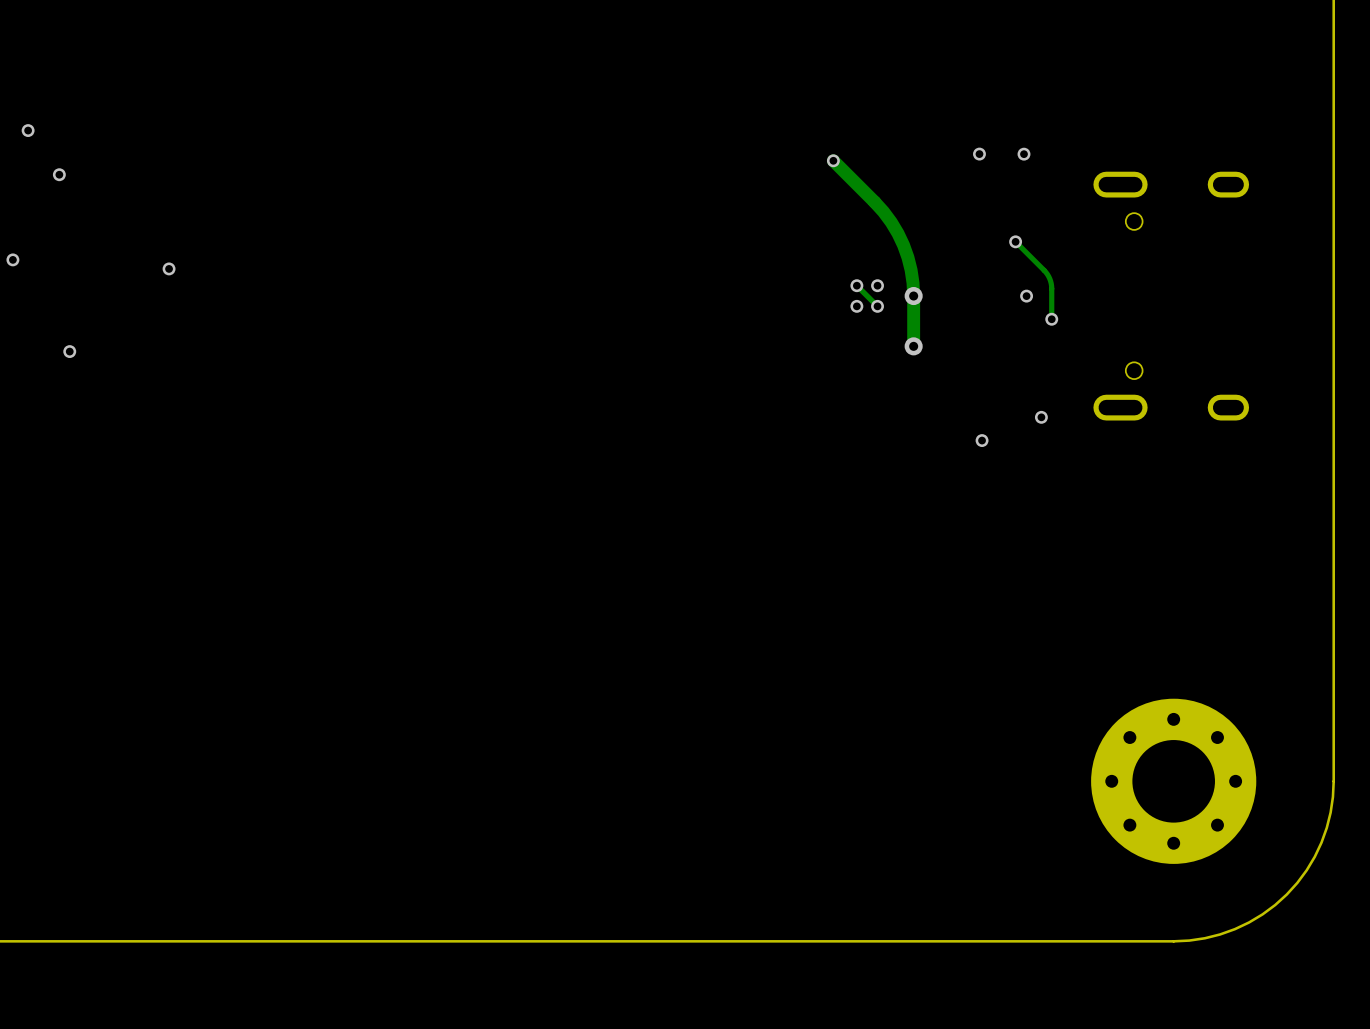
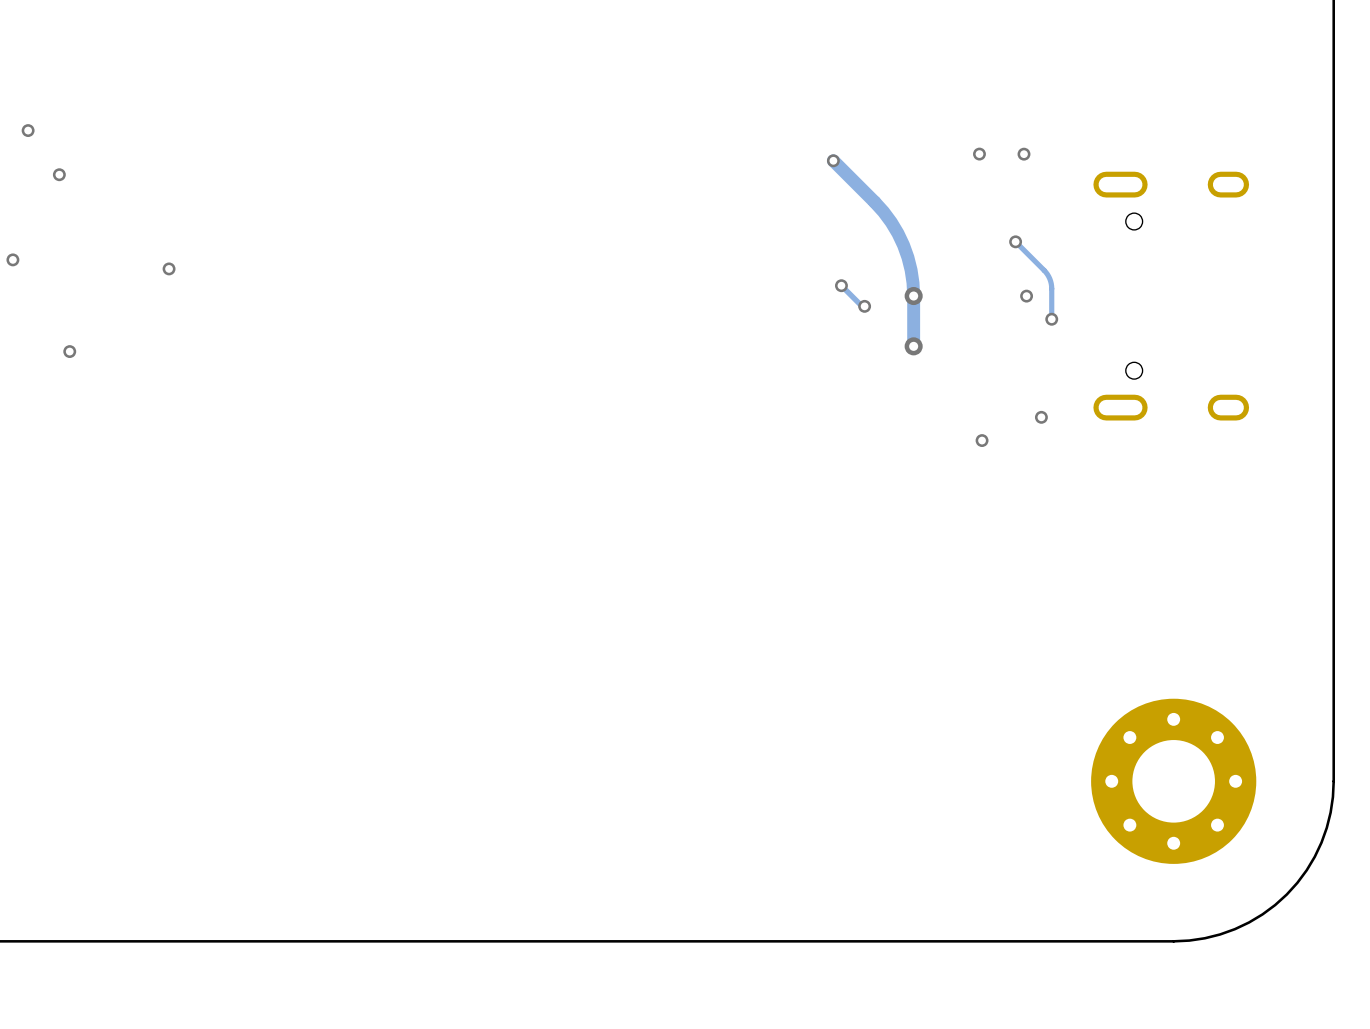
track: none -> (841, 285) (862, 306) (864, 306)
via: none -> (841, 285)
track: (856, 285) (877, 306) -> none
via: (856, 285) -> none
via: (877, 285) -> none
via: (856, 306) -> none
via: none -> (864, 306)
via: (877, 306) -> none

